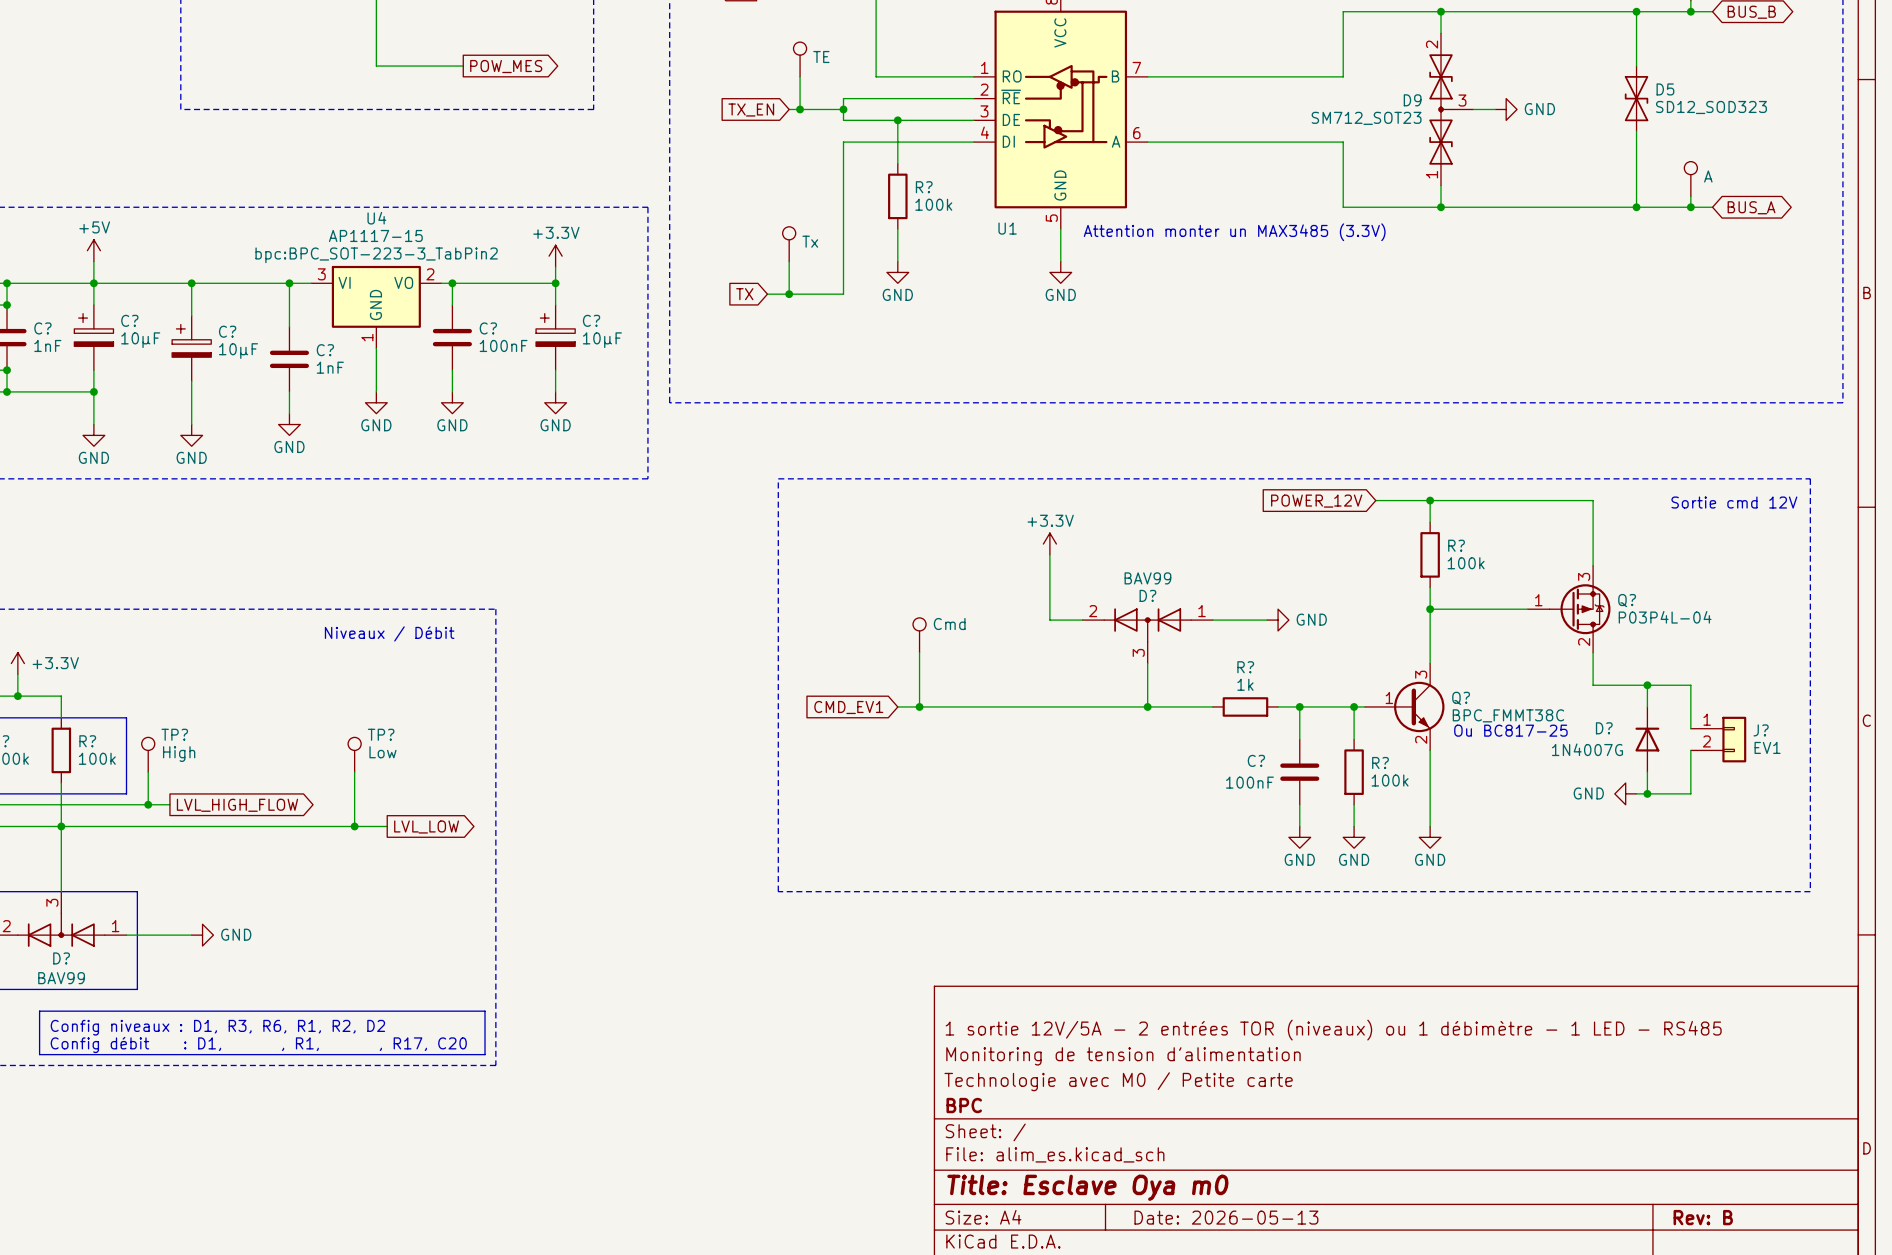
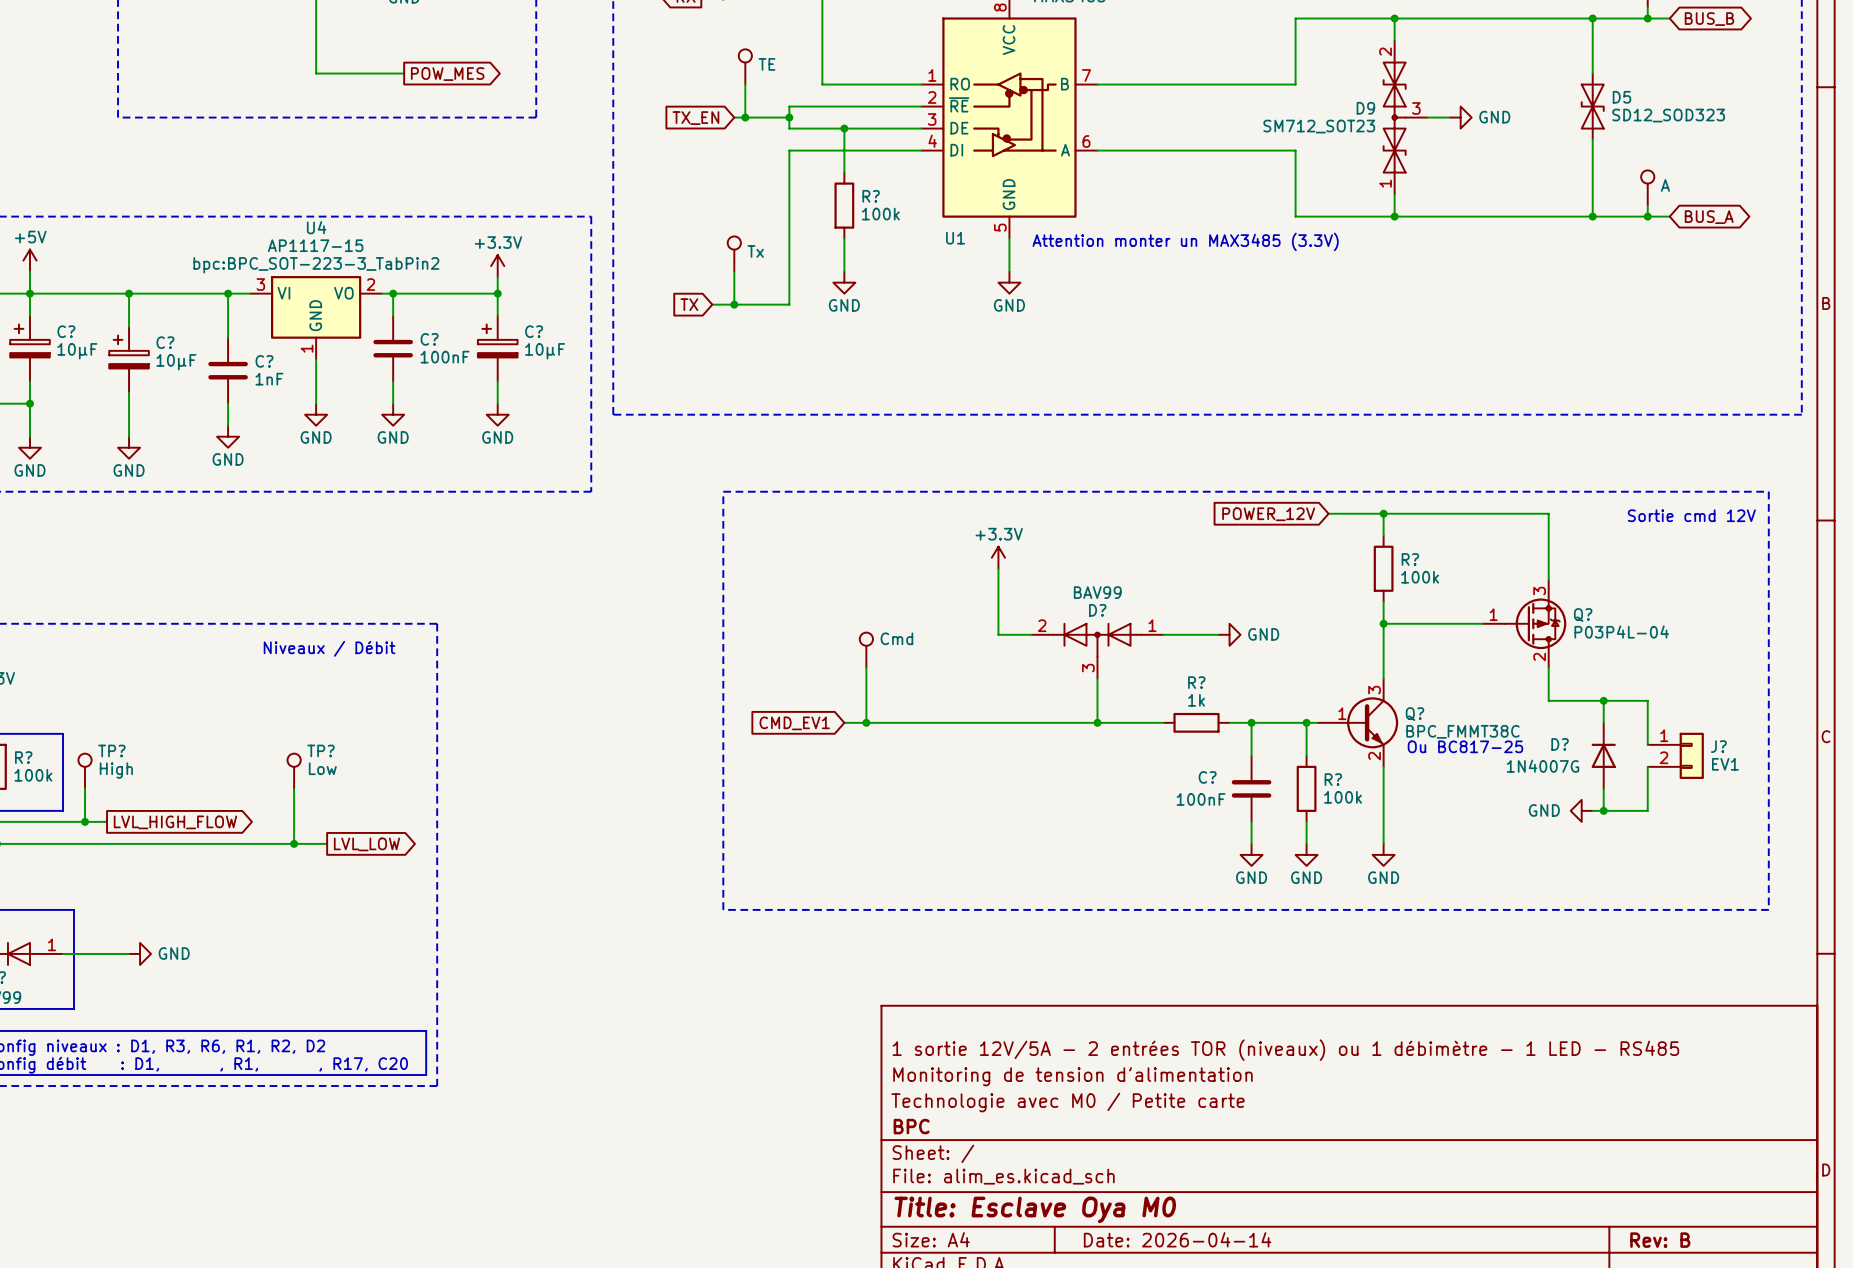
title block: Title: Esclave Oya m0 (1087, 1187) -> Title: Esclave Oya M0 (1035, 1209)
title block: Date: 2026-05-13 (1226, 1217) -> Date: 2026-04-14 (1177, 1239)

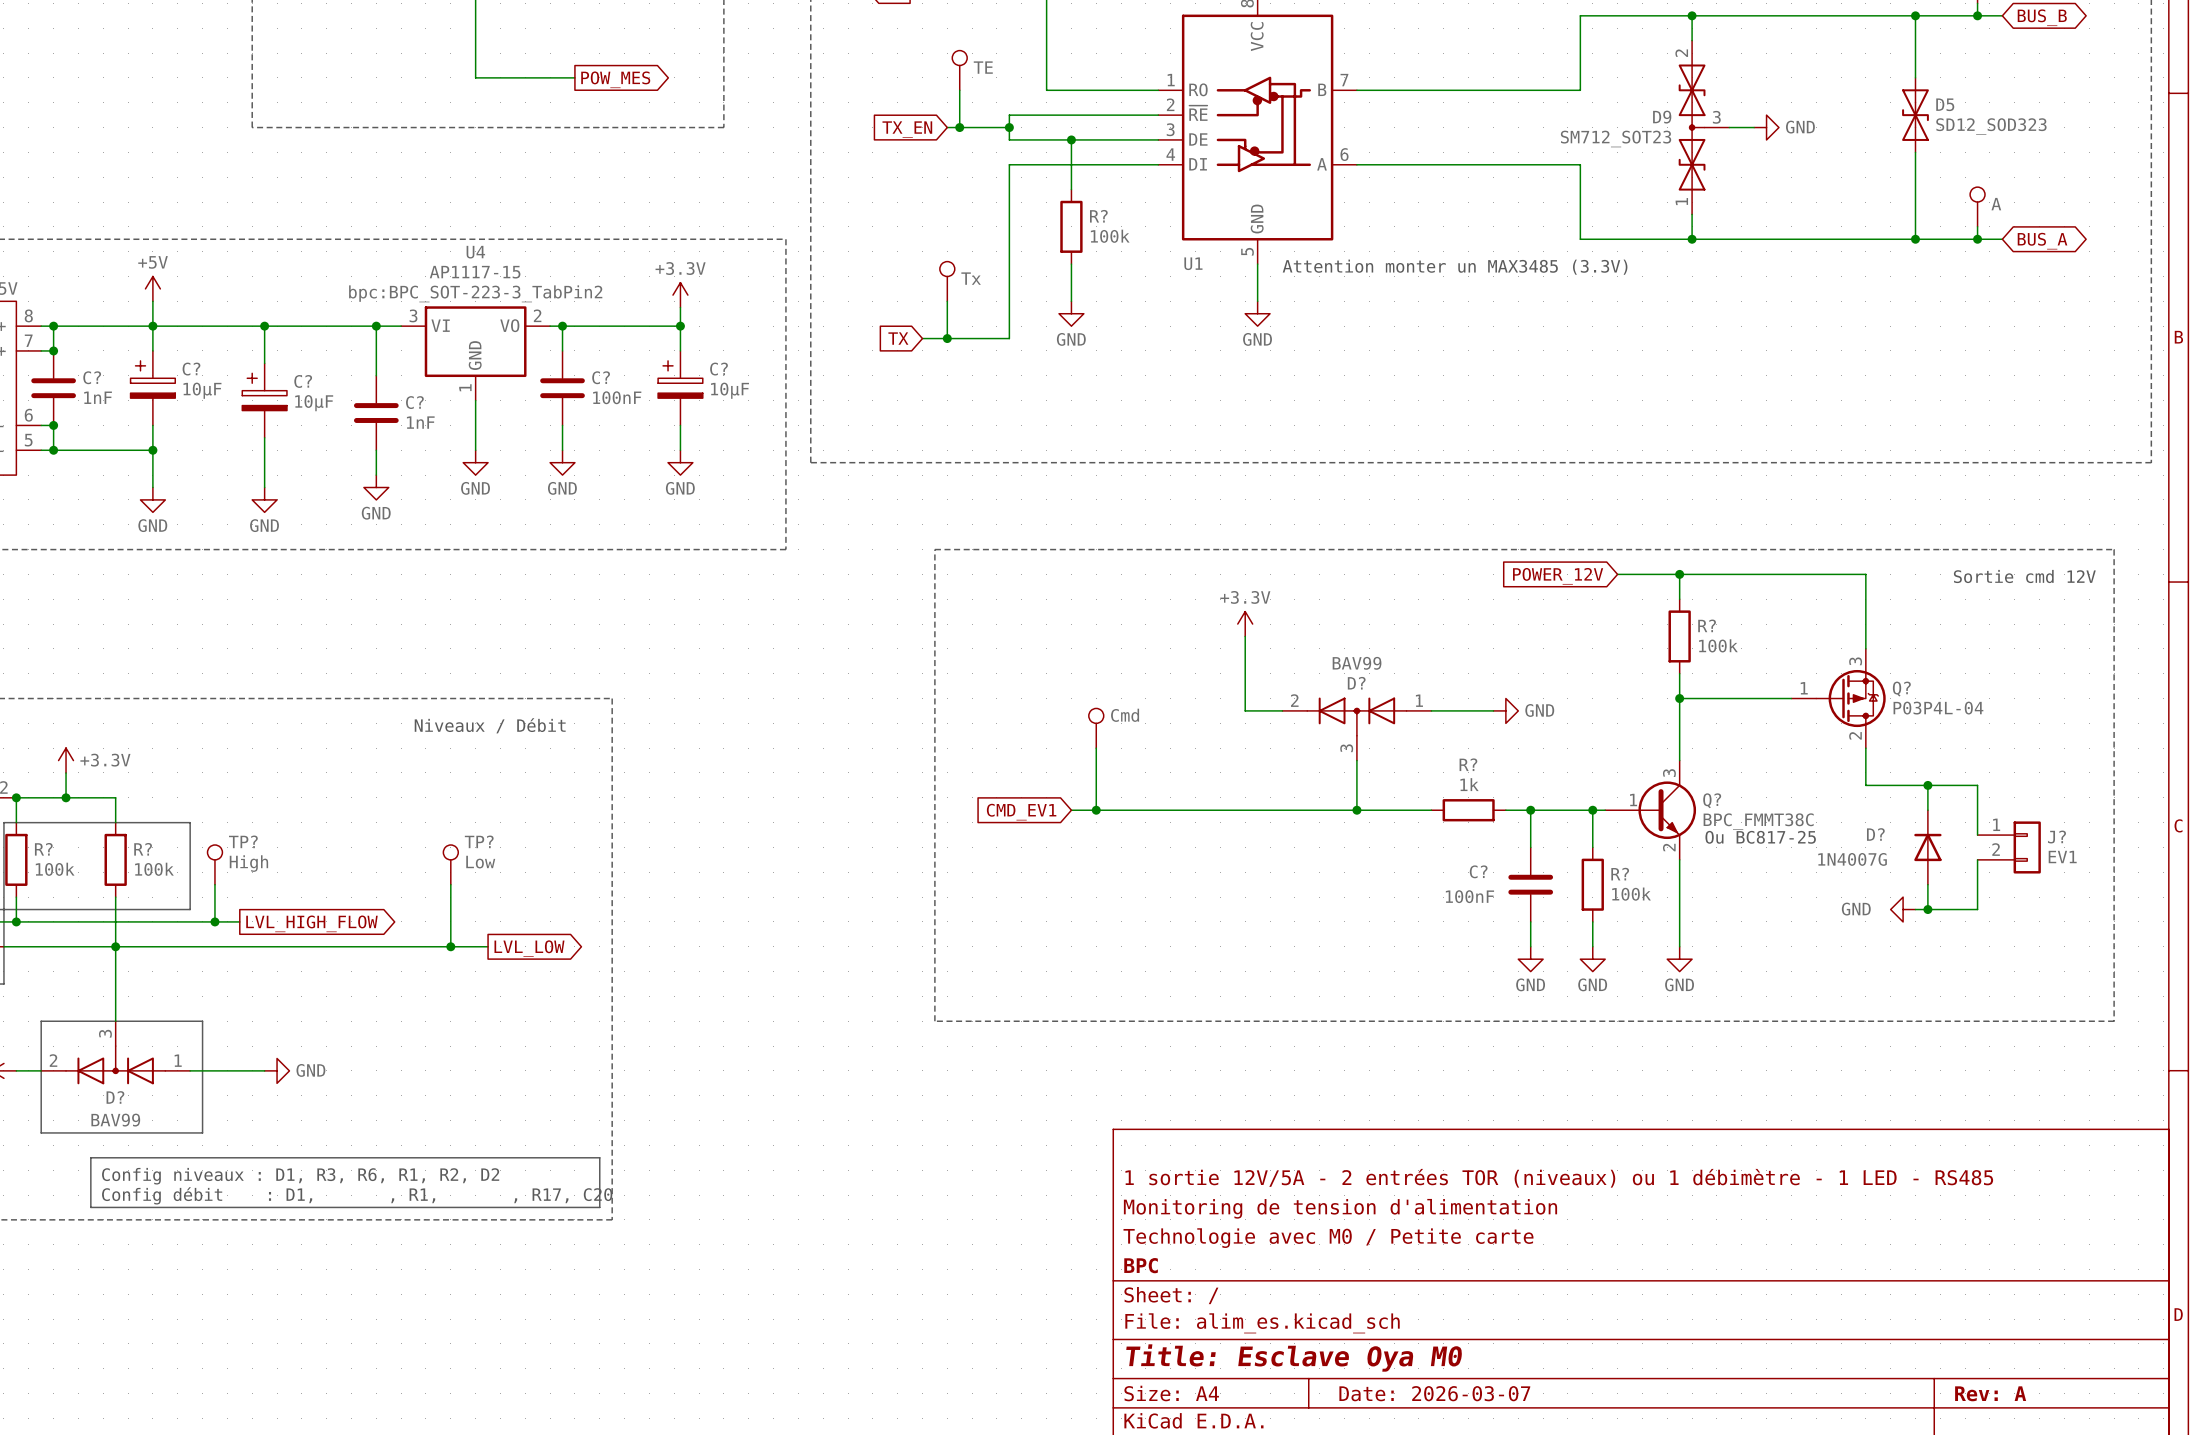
title block: Date: 2026-04-14 (1177, 1239) -> Date: 2026-03-07 (1434, 1393)
title block: Rev: B (1660, 1240) -> Rev: A (1990, 1393)

